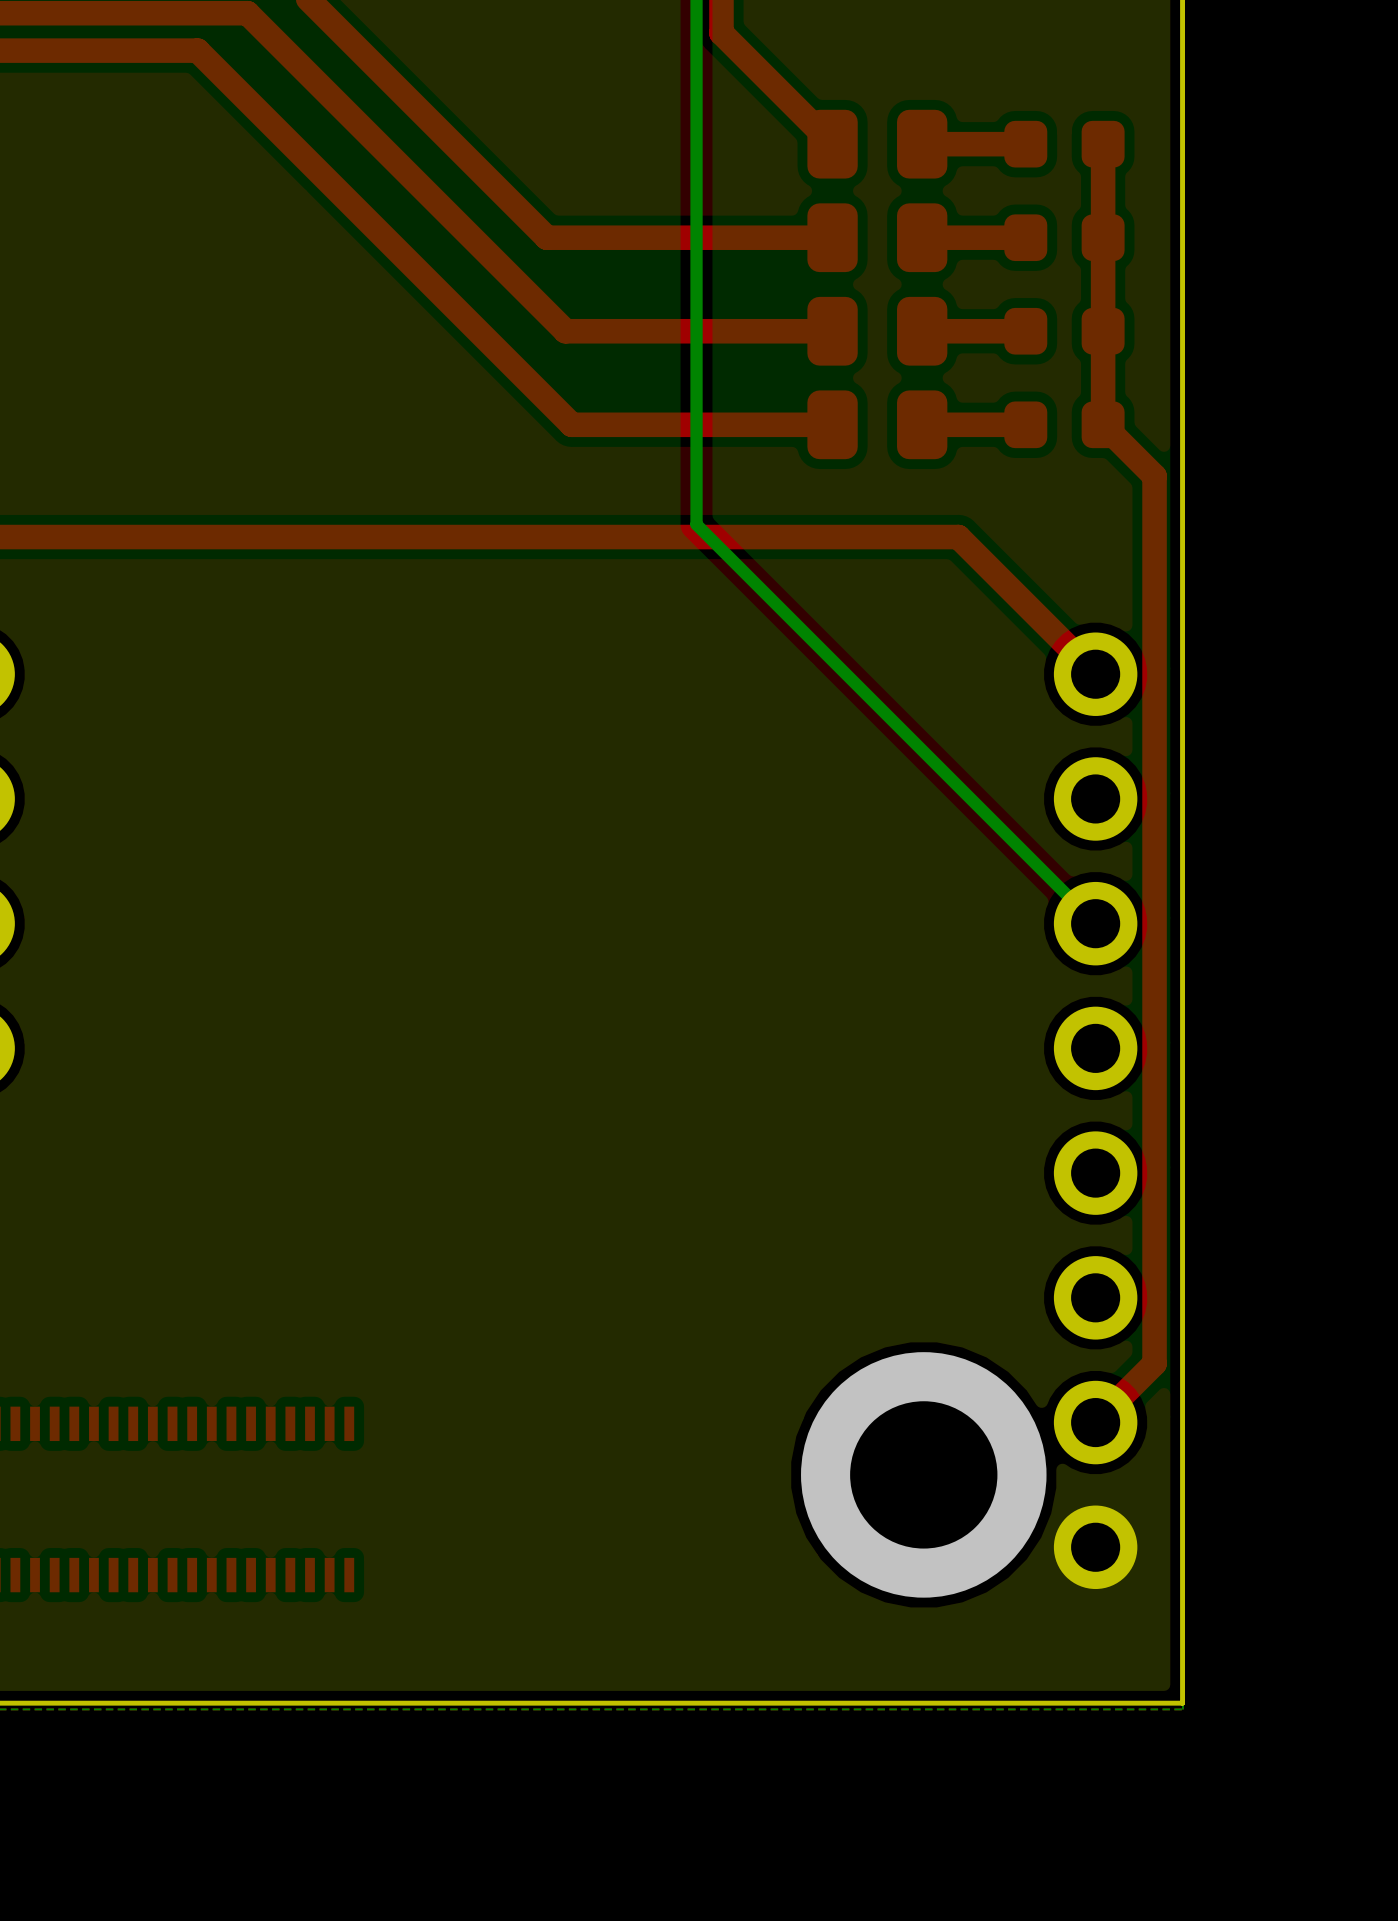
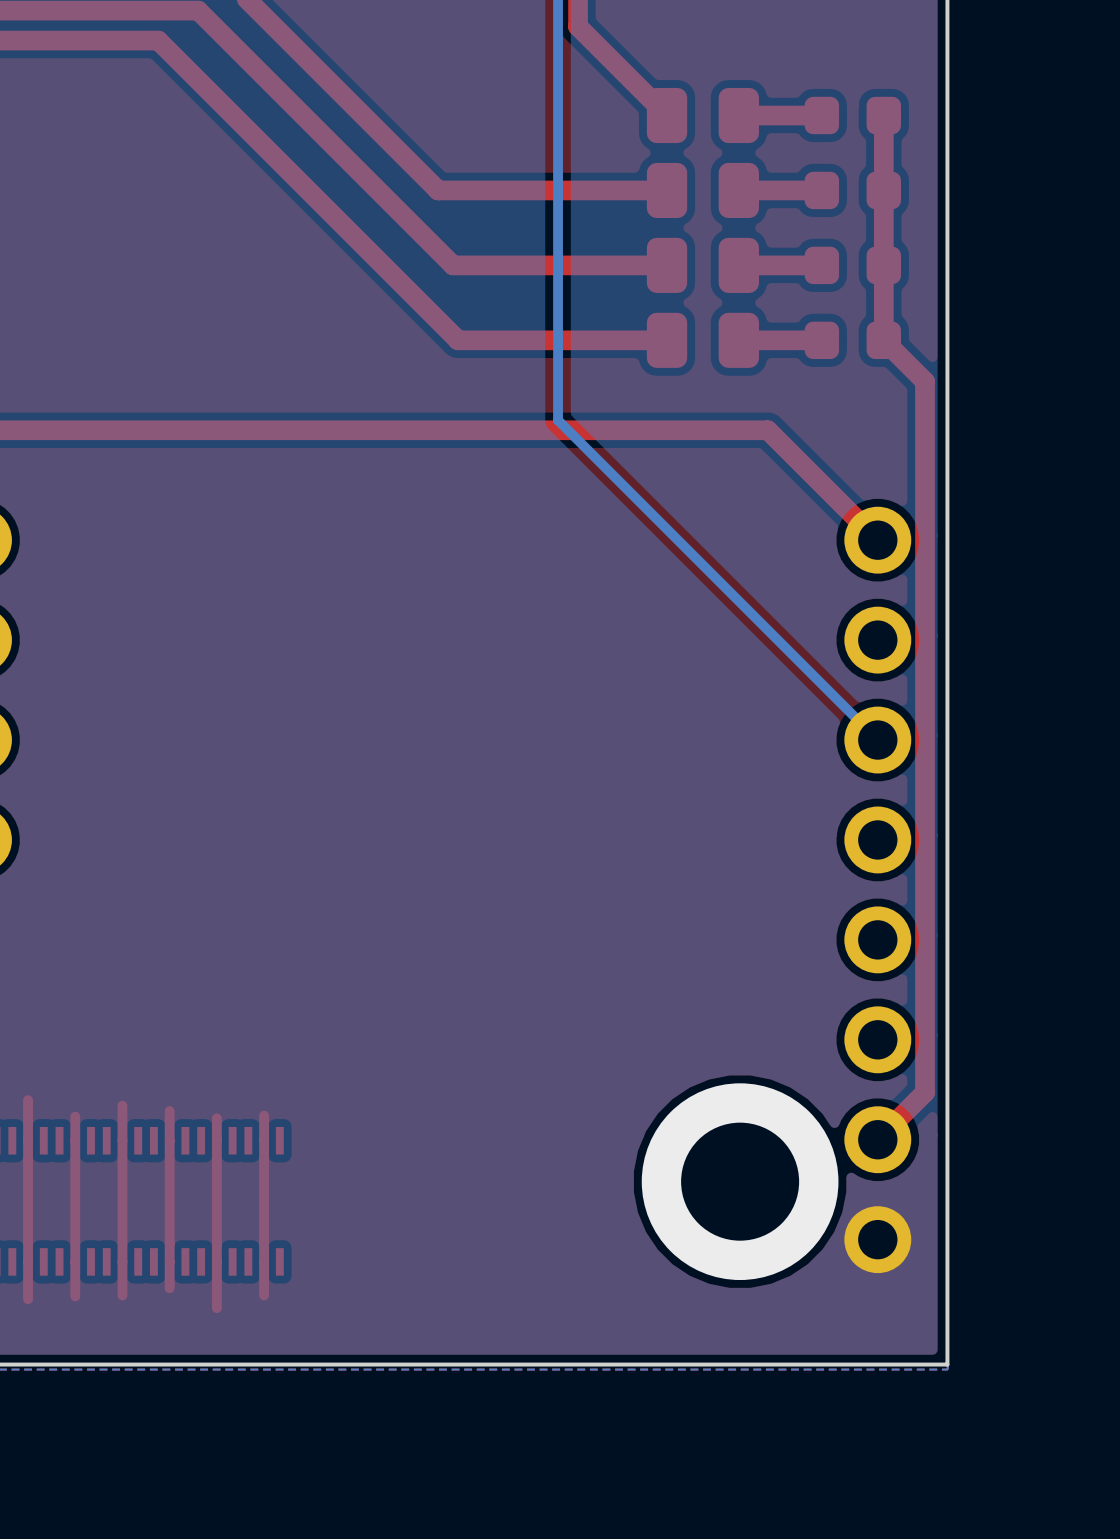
top track: none -> (28, 1100) (28, 1299)
top track: none -> (122, 1105) (122, 1295)
top track: none -> (169, 1111) (169, 1288)
top track: none -> (264, 1115) (264, 1295)
top track: none -> (75, 1116) (75, 1296)
top track: none -> (216, 1118) (216, 1308)

